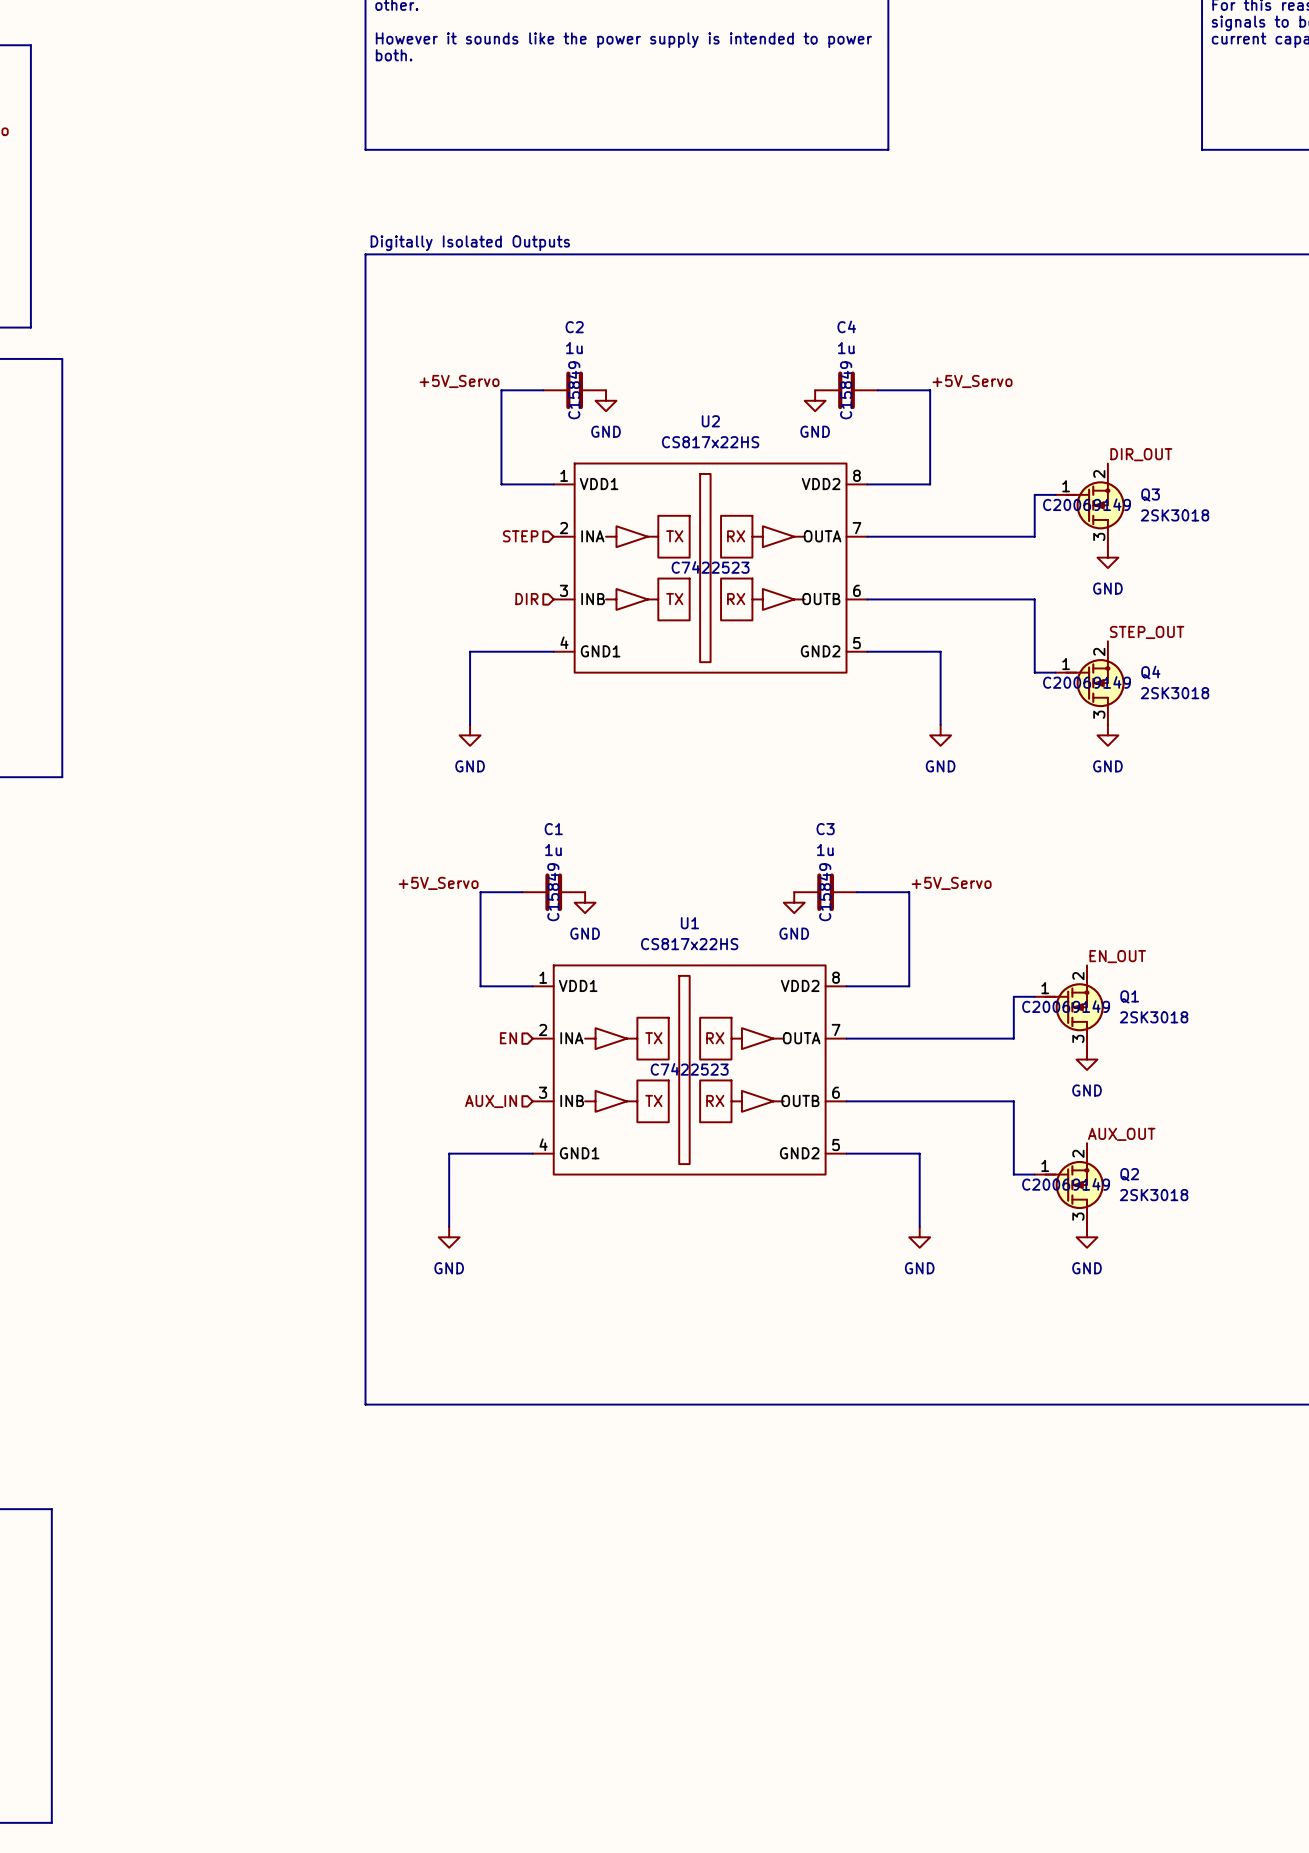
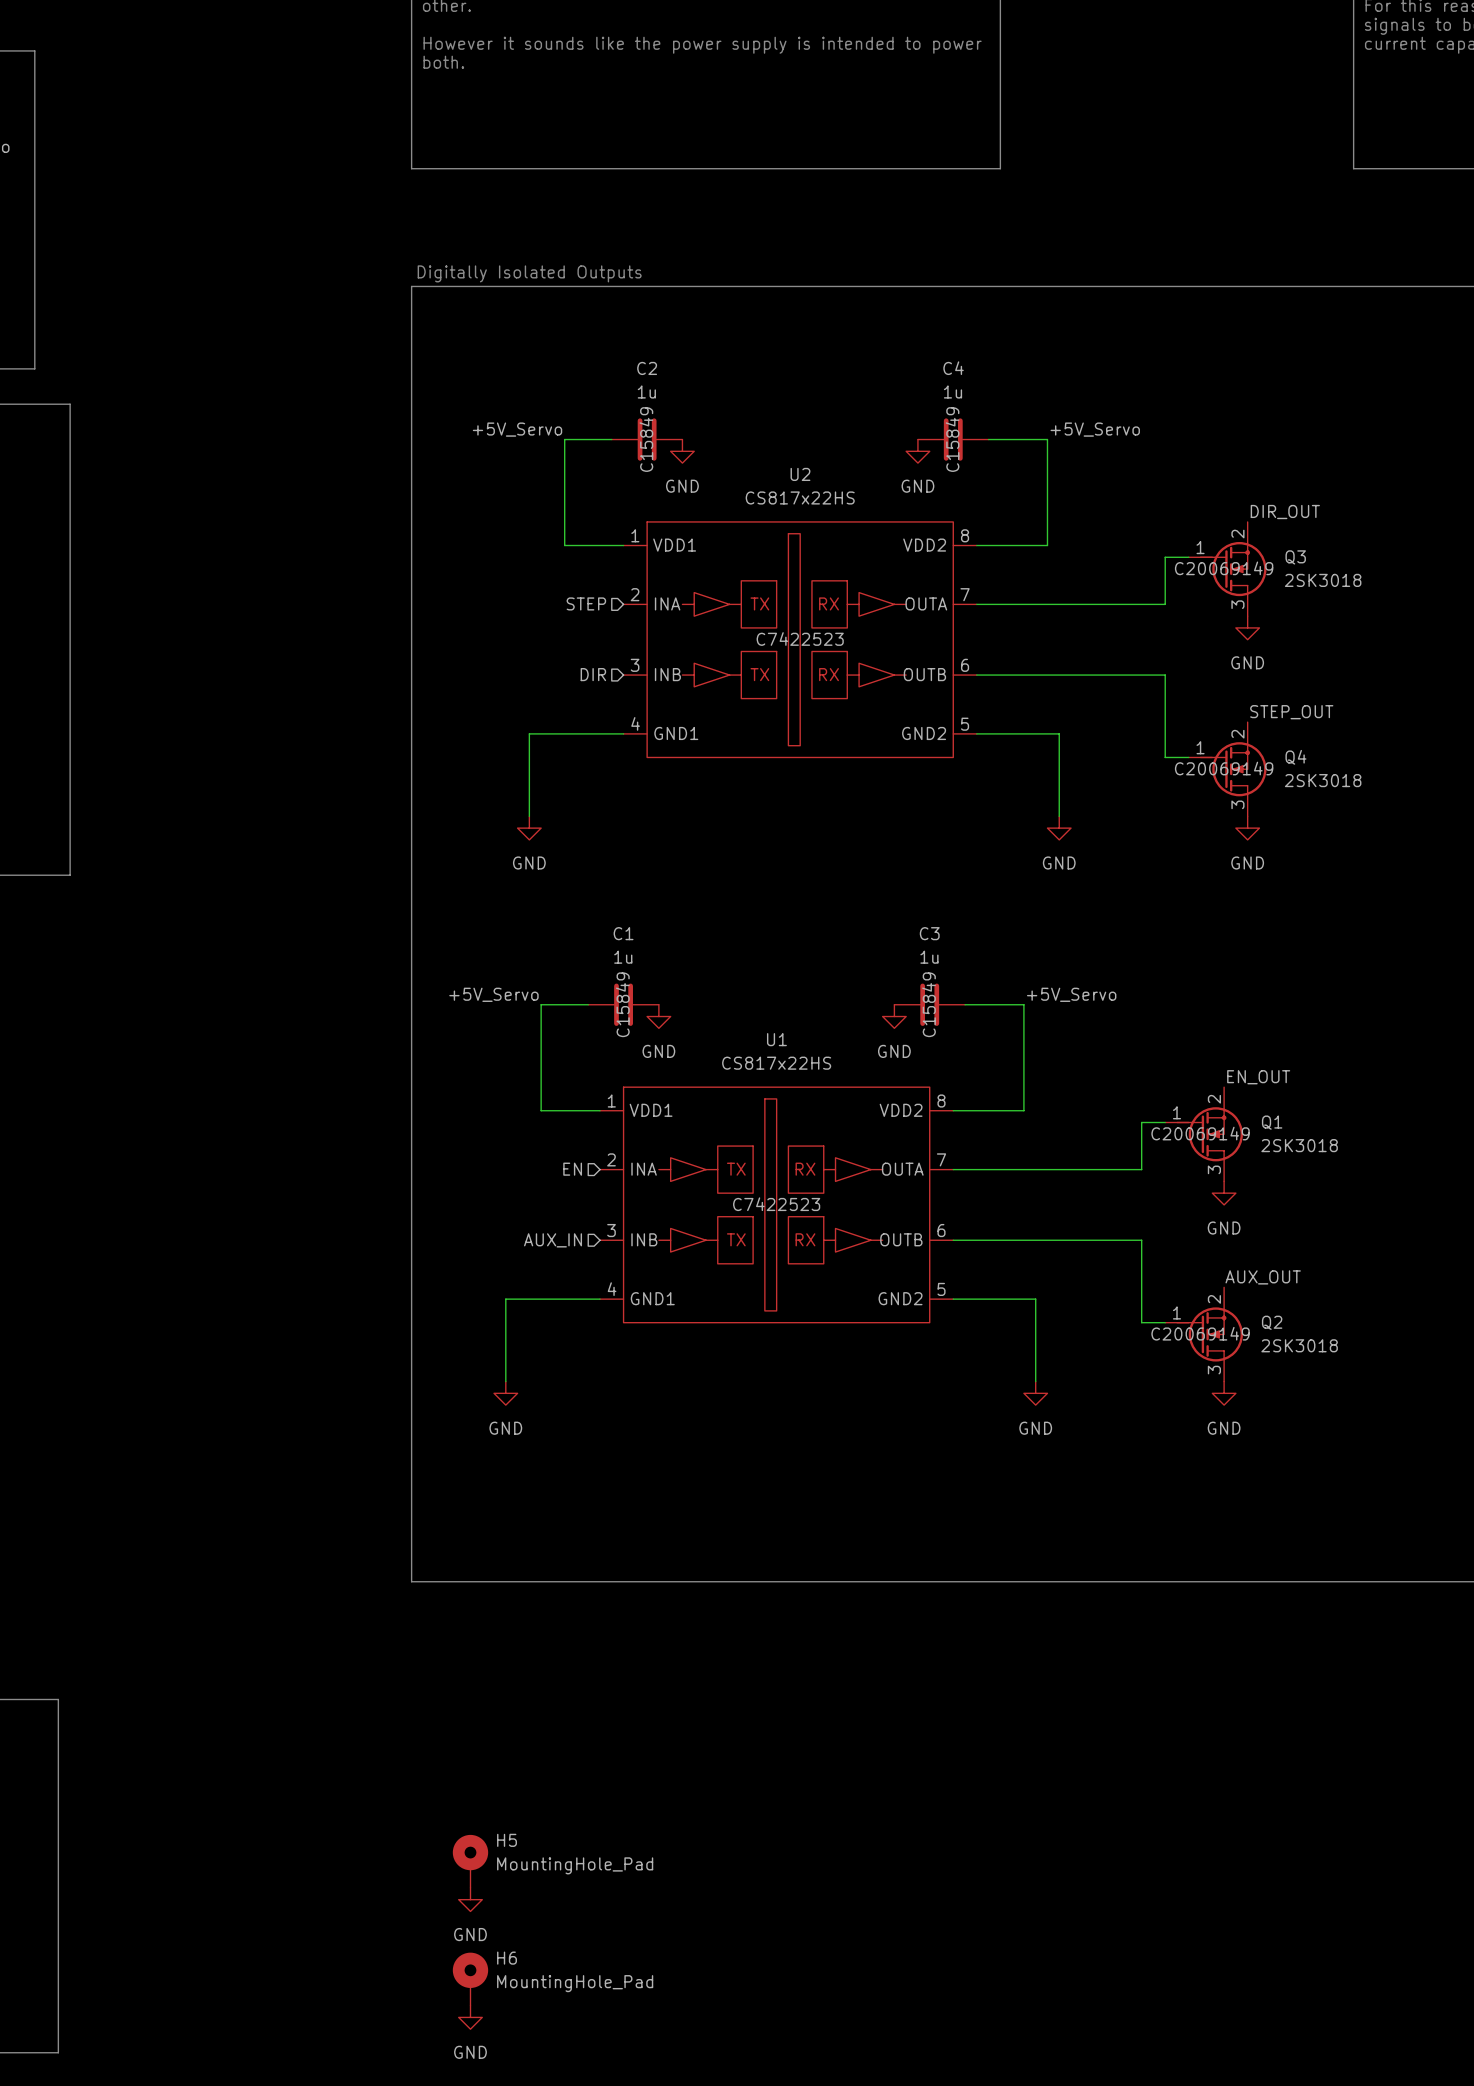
H5: none -> MountingHole_Pad (470, 1861)
power symbol: none -> GND (470, 1899)
H6: none -> MountingHole_Pad (470, 1979)
power symbol: none -> GND (470, 2017)

